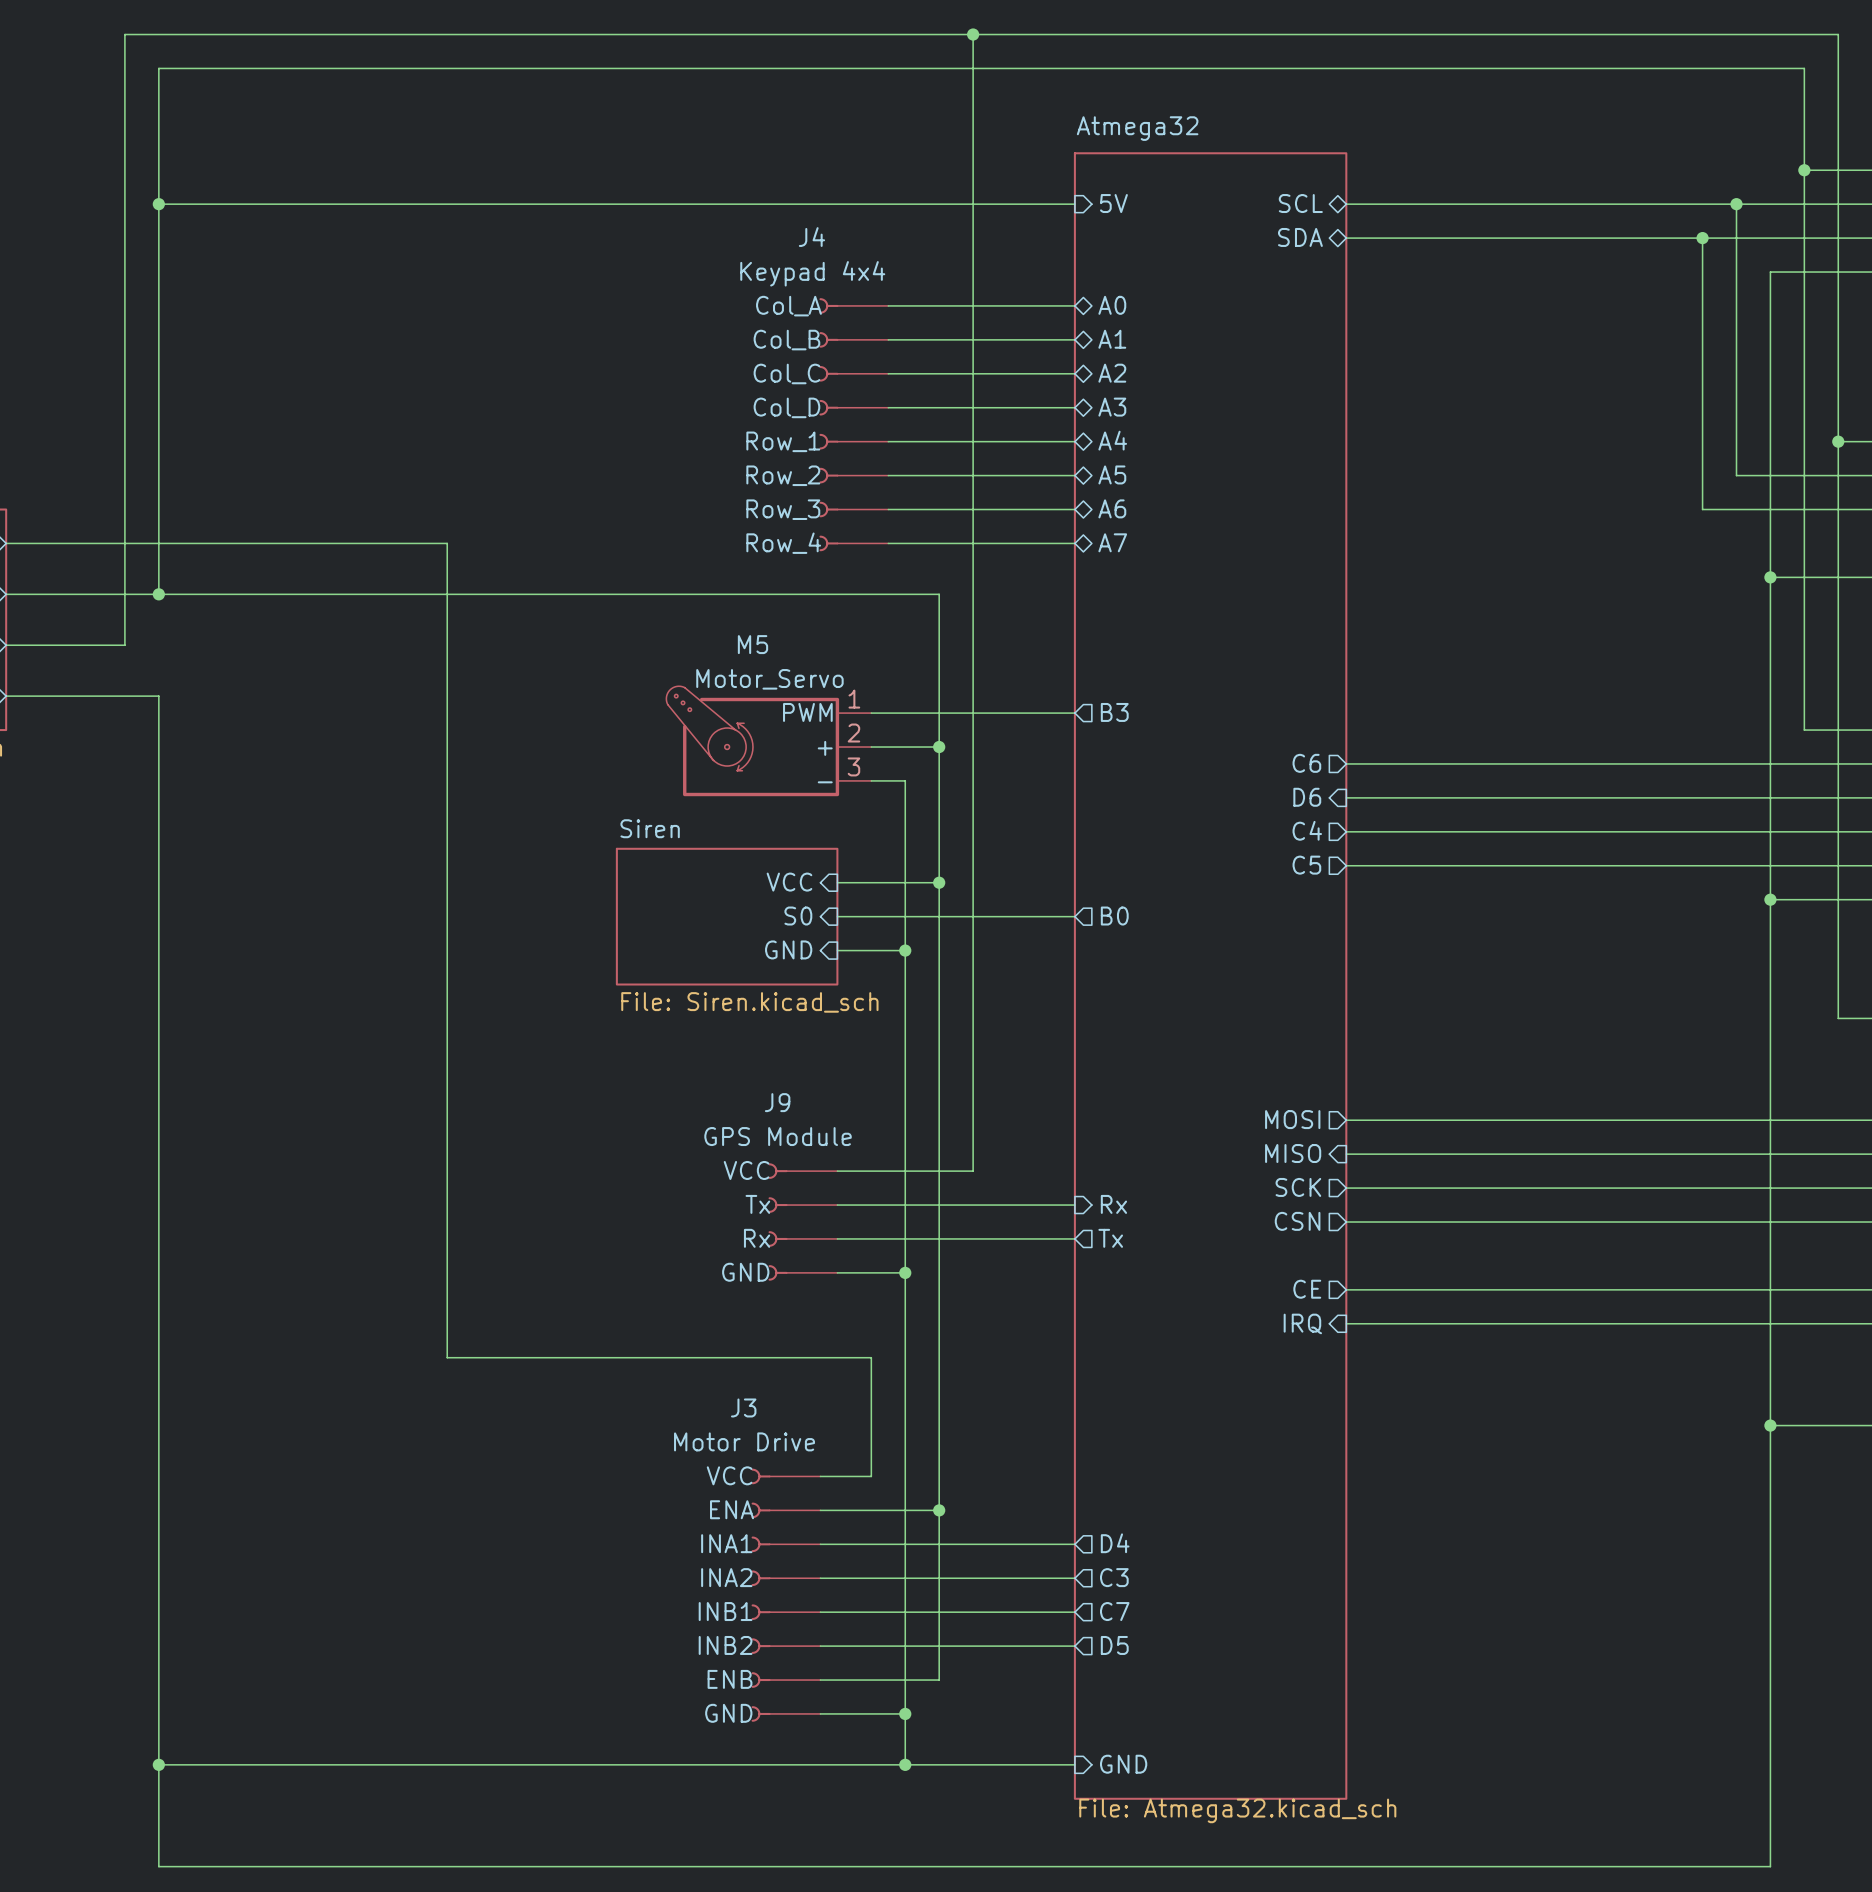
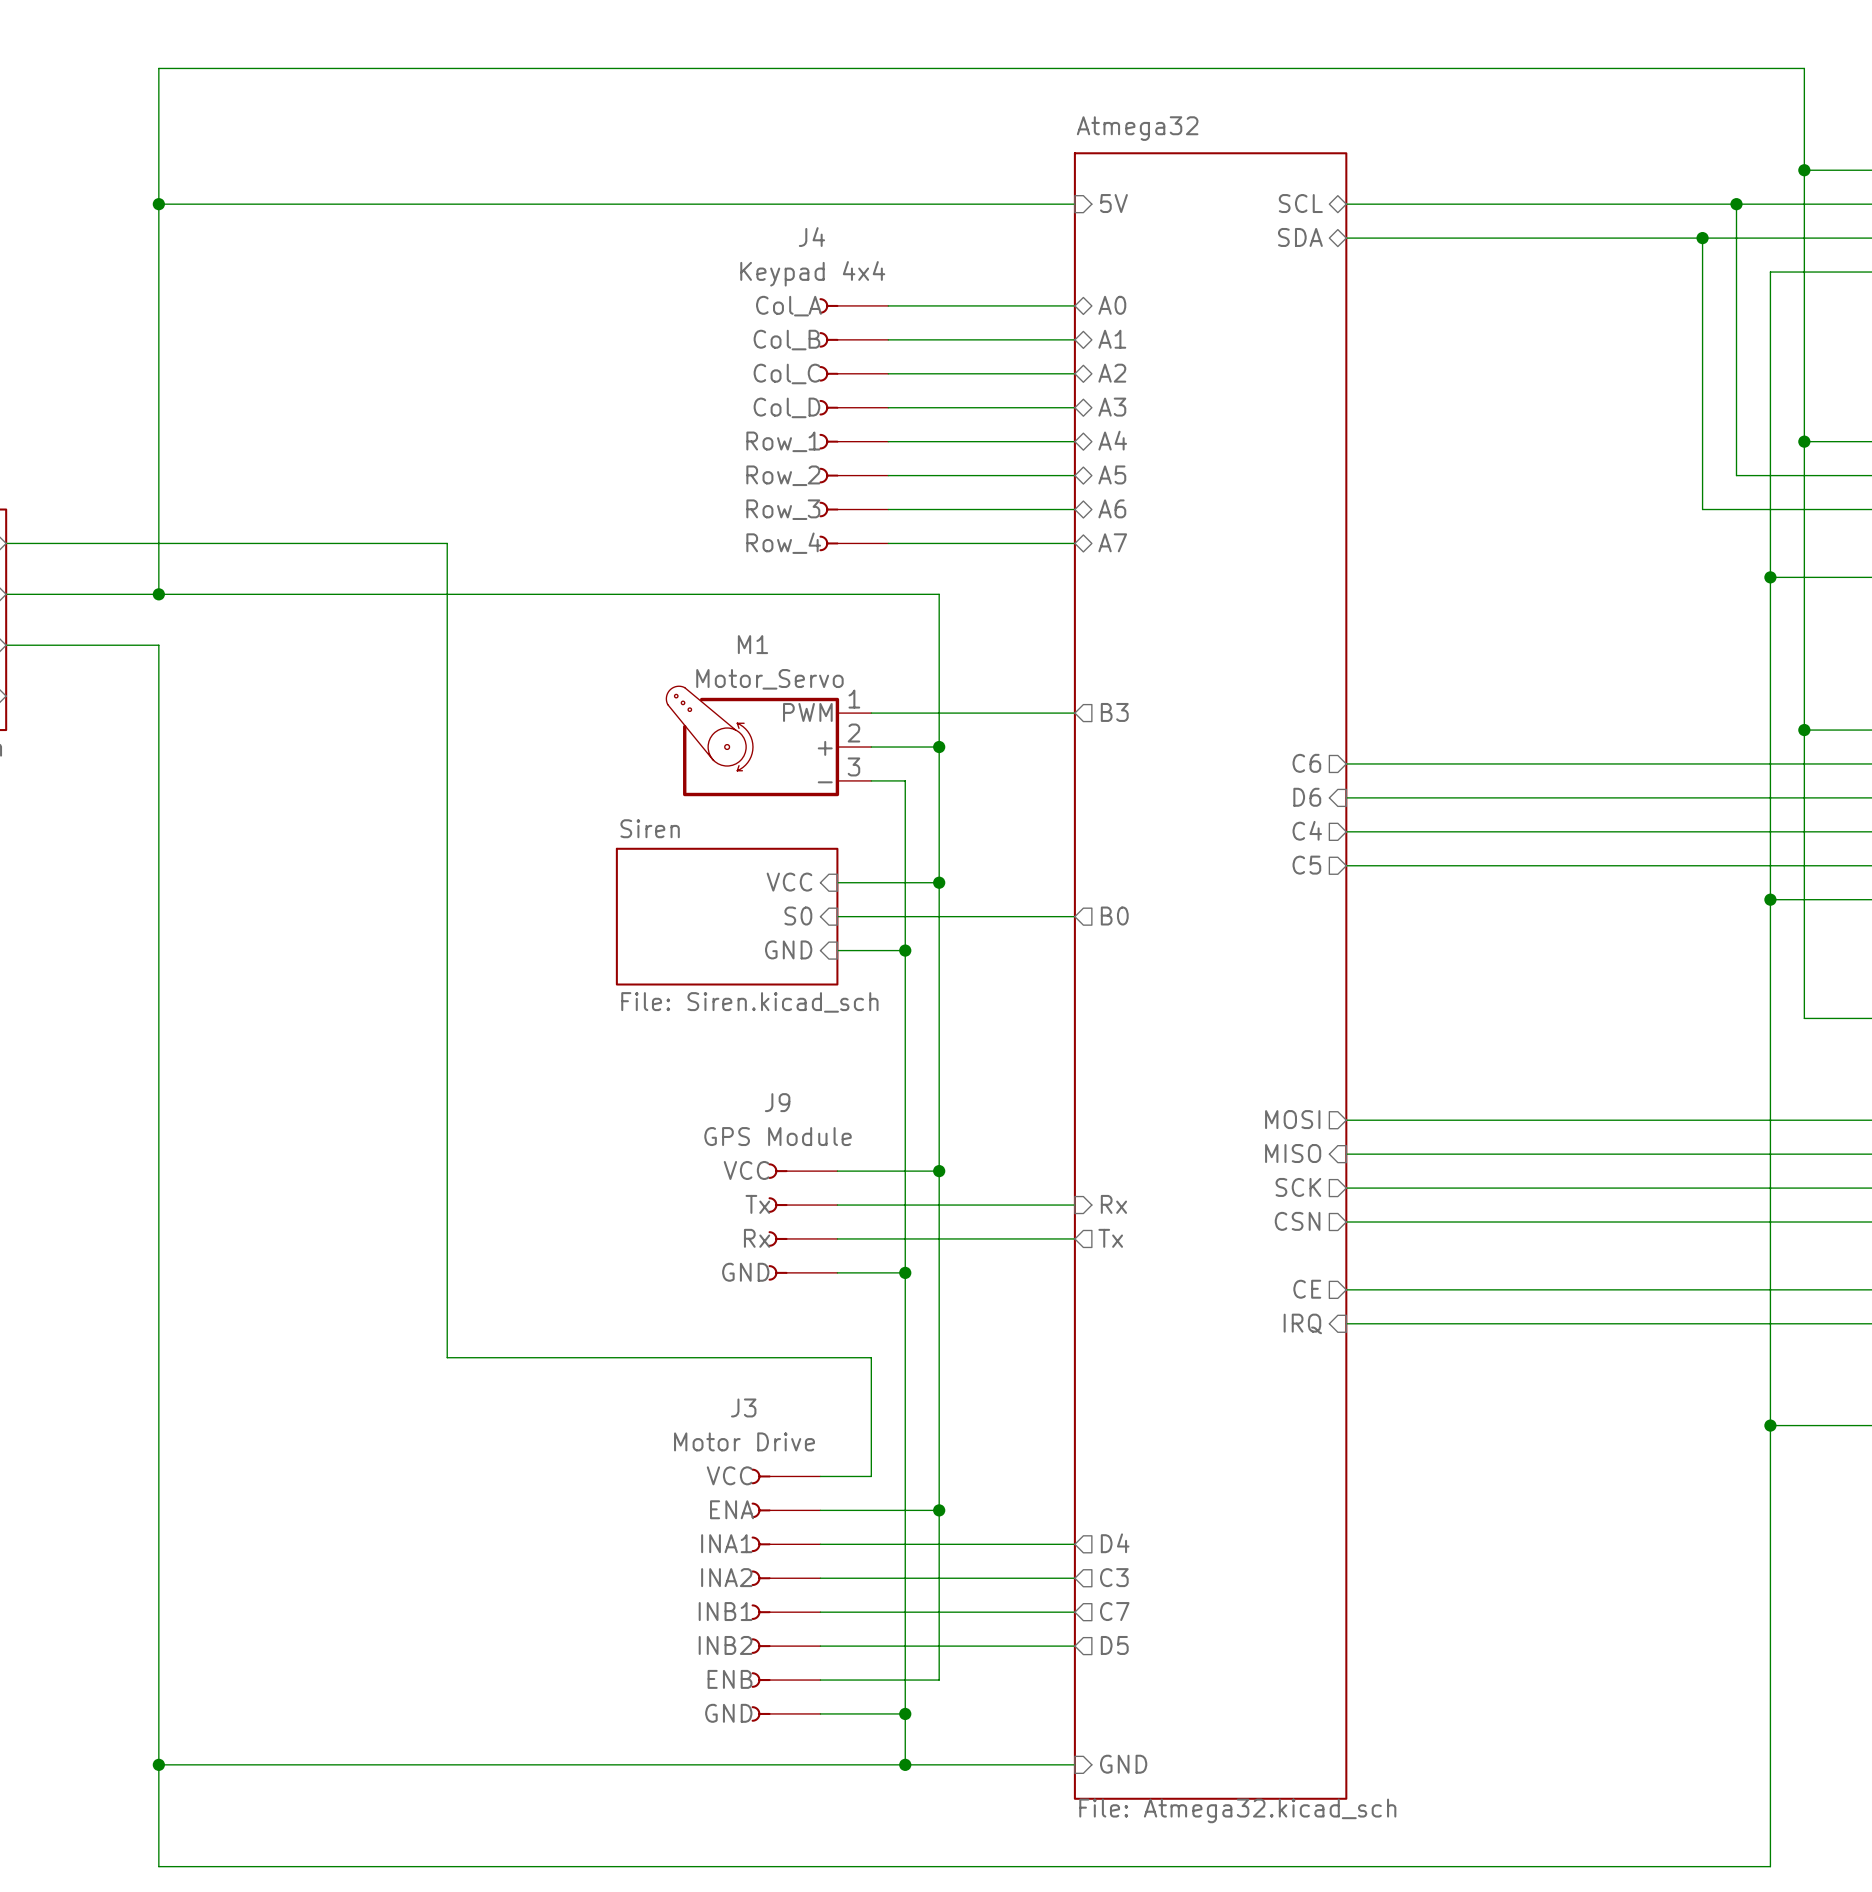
wire: (973, 34) (973, 1171) (939, 1171) -> none
junction: (973, 34) -> none
wire: none -> (1804, 441) (1838, 441)
junction position: (1838, 441) -> (1804, 441)
M5 name: M5 (752, 644) -> M1 (752, 644)
wire: (124, 645) (124, 34) (1838, 34) (1838, 1018) -> (1804, 730) (1804, 1018) (1838, 1018)
wire: (6, 696) (158, 696) -> (124, 645) (158, 645) (158, 696)
junction: none -> (1804, 730)
junction: none -> (939, 1171)

